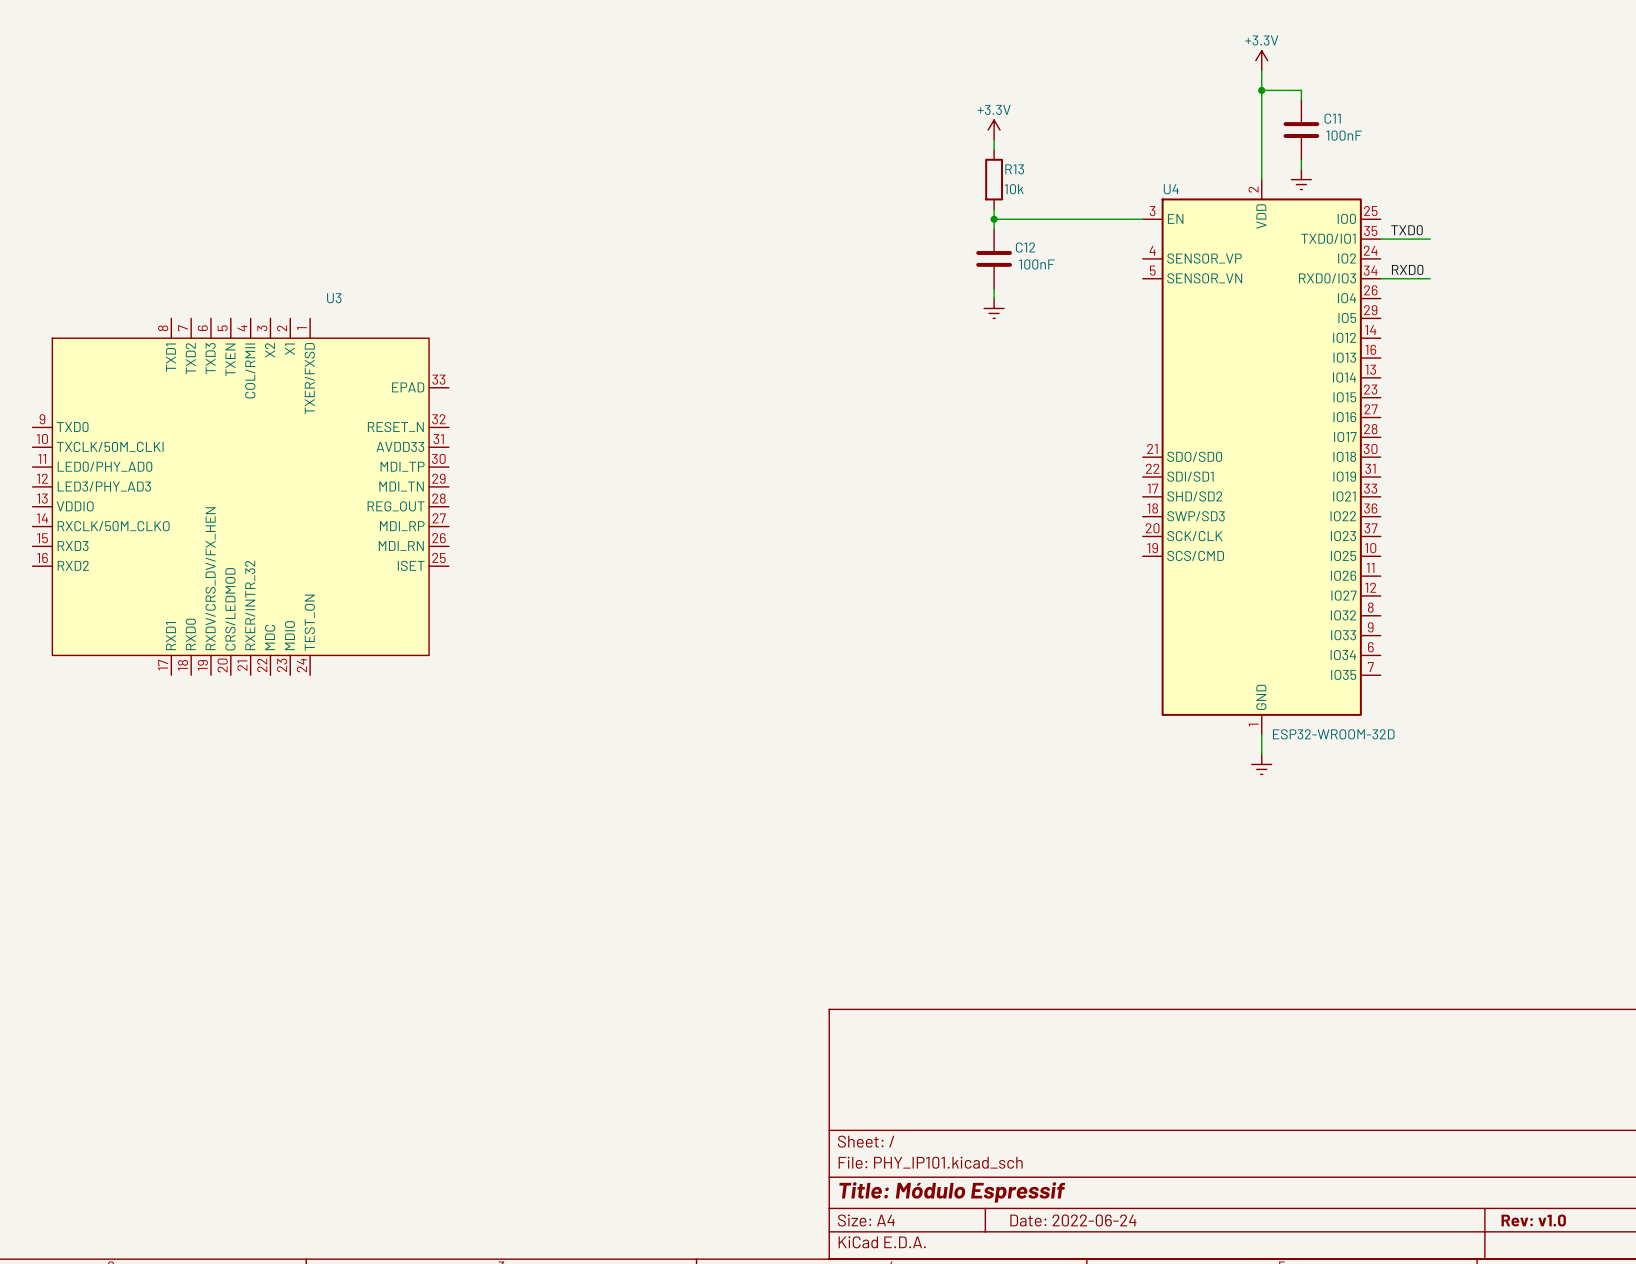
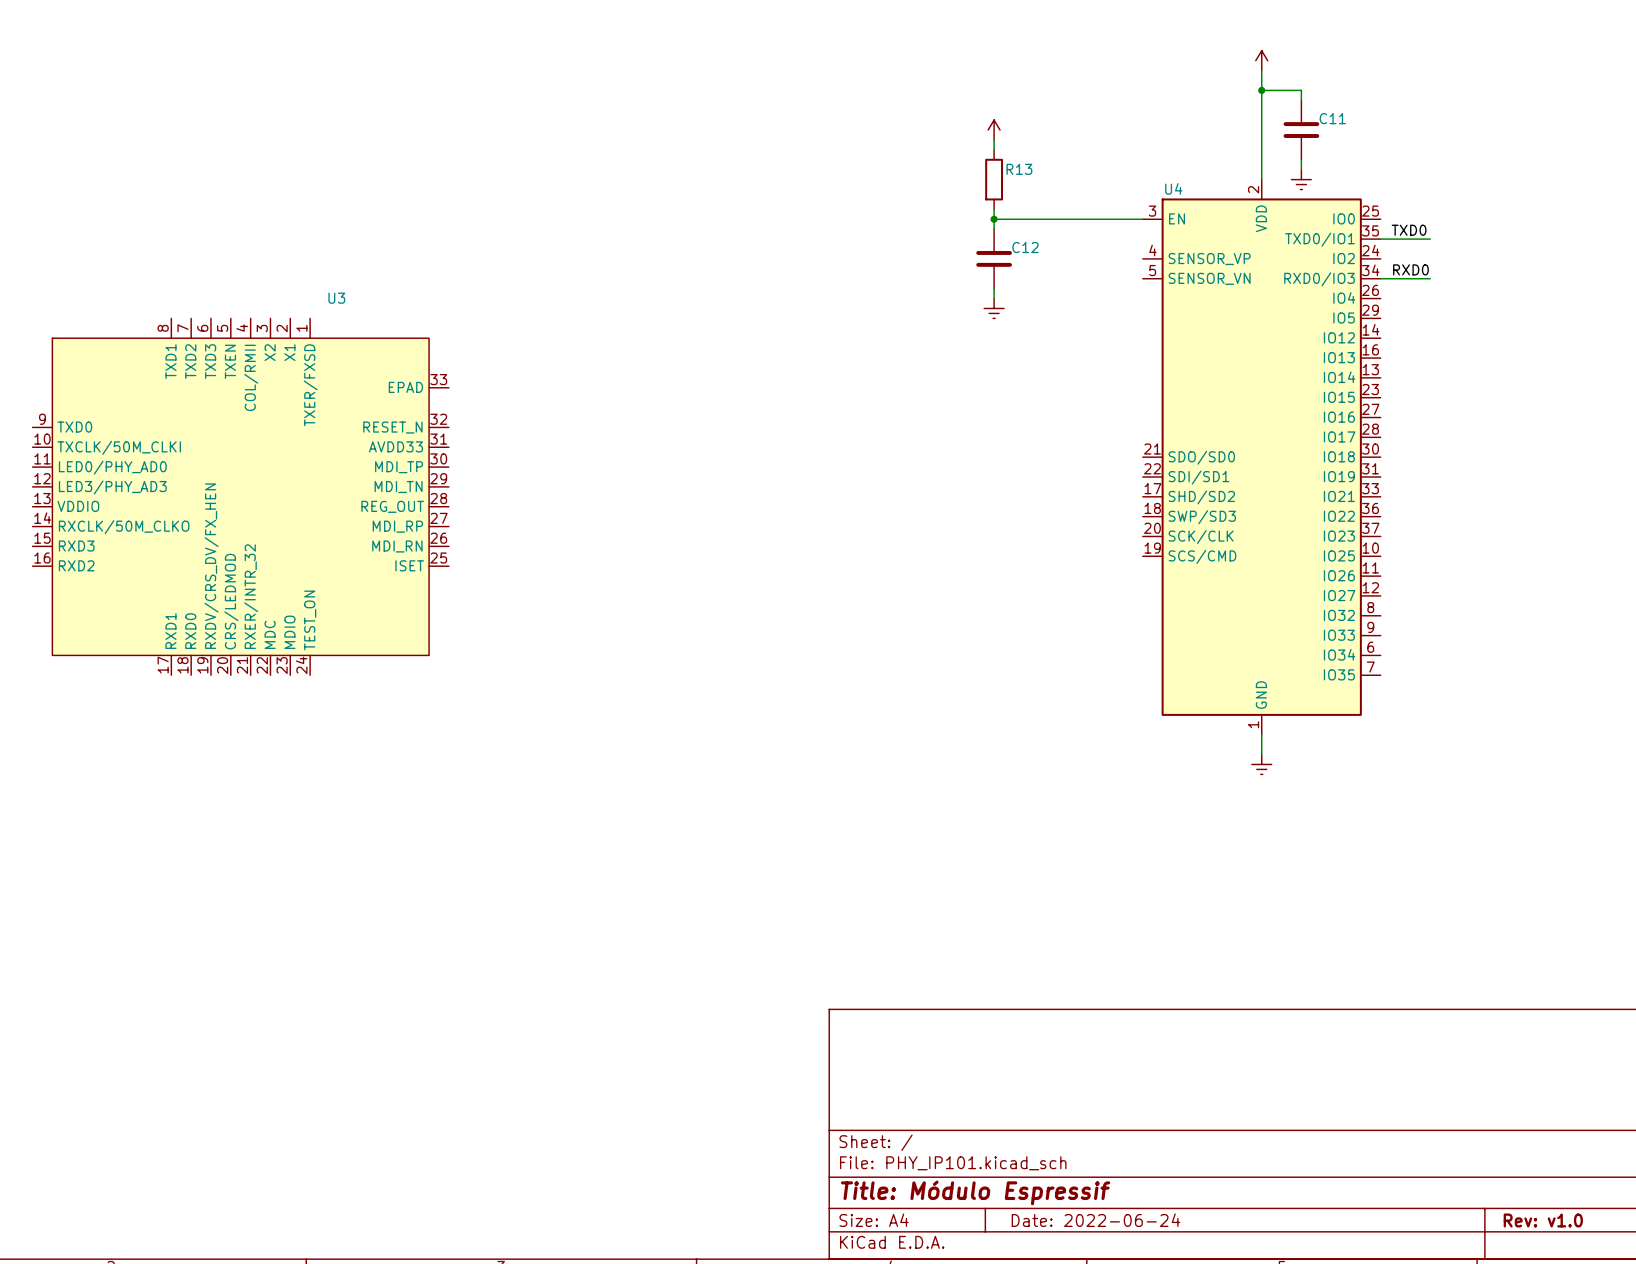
power symbol text: +3.3V (1261, 40) -> none
power symbol text: +3.3V (994, 109) -> none
C11 value: 100nF (1344, 135) -> none
R13 value: 10k (1014, 189) -> none
C12 value: 100nF (1036, 264) -> none
U4 value: ESP32-WROOM-32D (1333, 734) -> none

